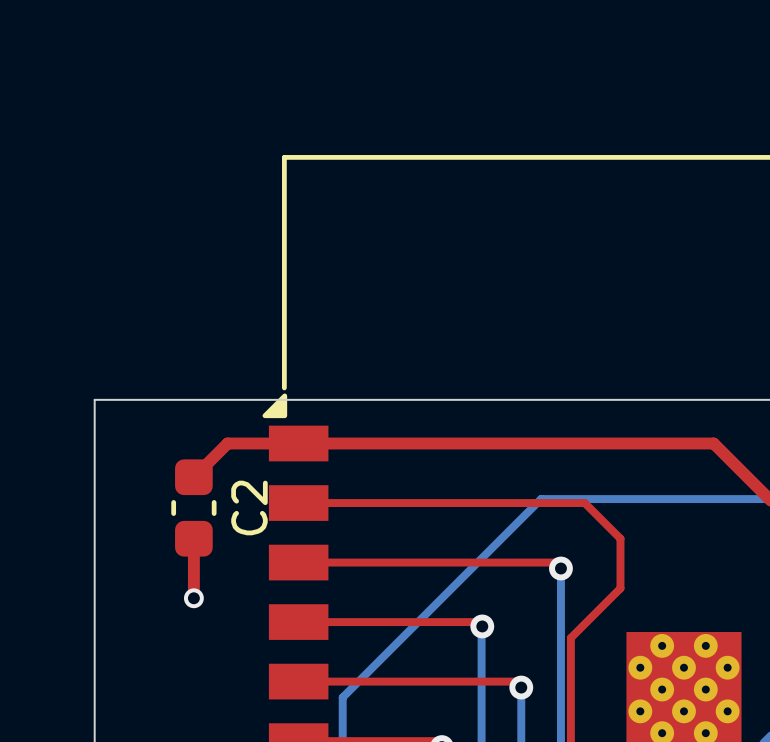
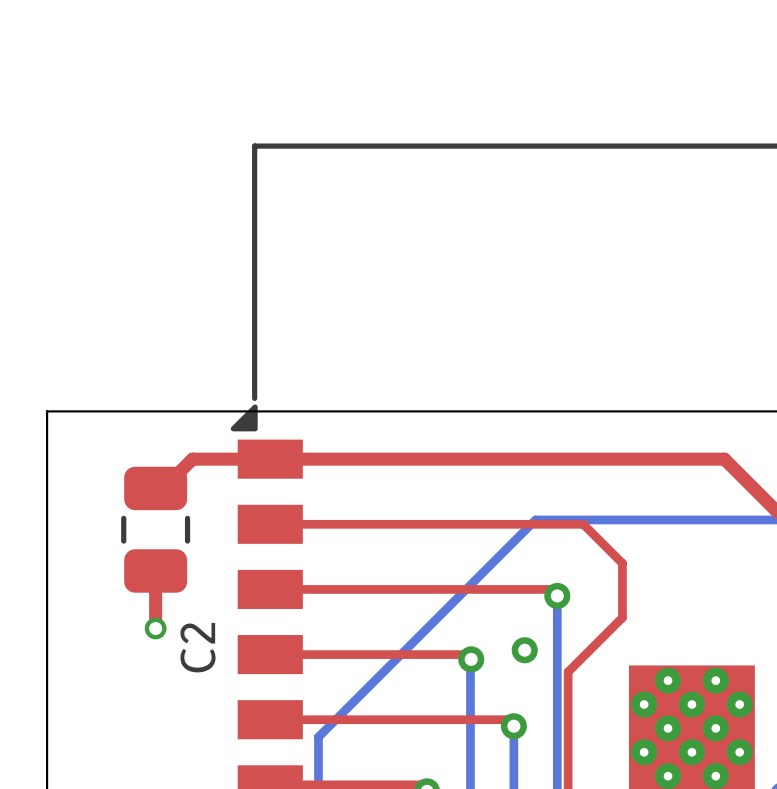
C2 footprint: [171, 459, 217, 557] -> [121, 466, 191, 593]
C2 name position: C2 (249, 507) -> C2 (197, 647)
via: none -> (524, 650)

